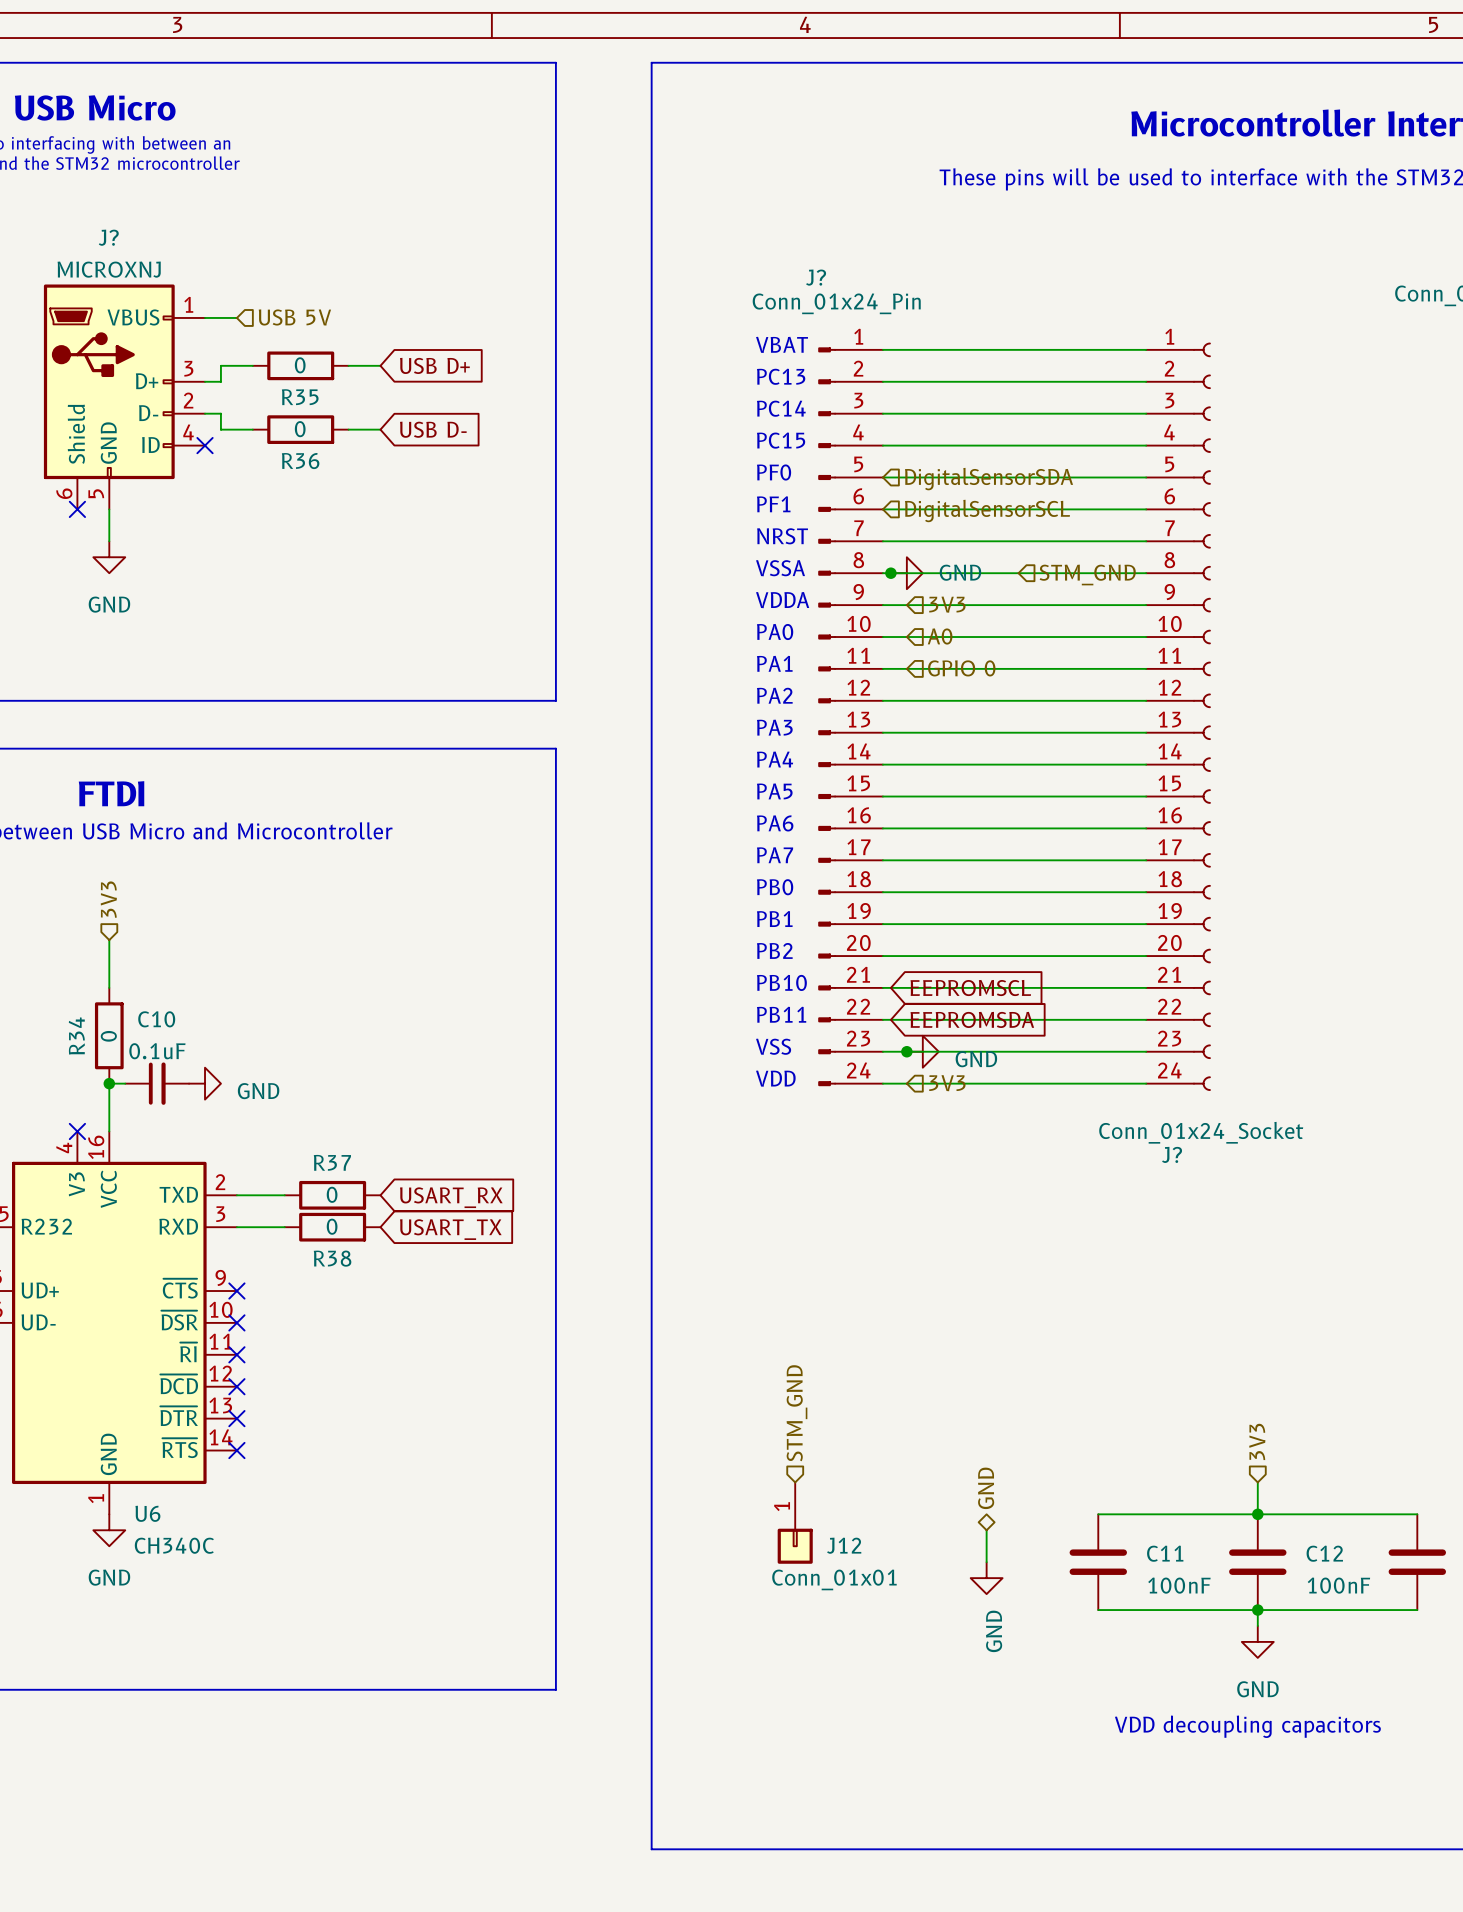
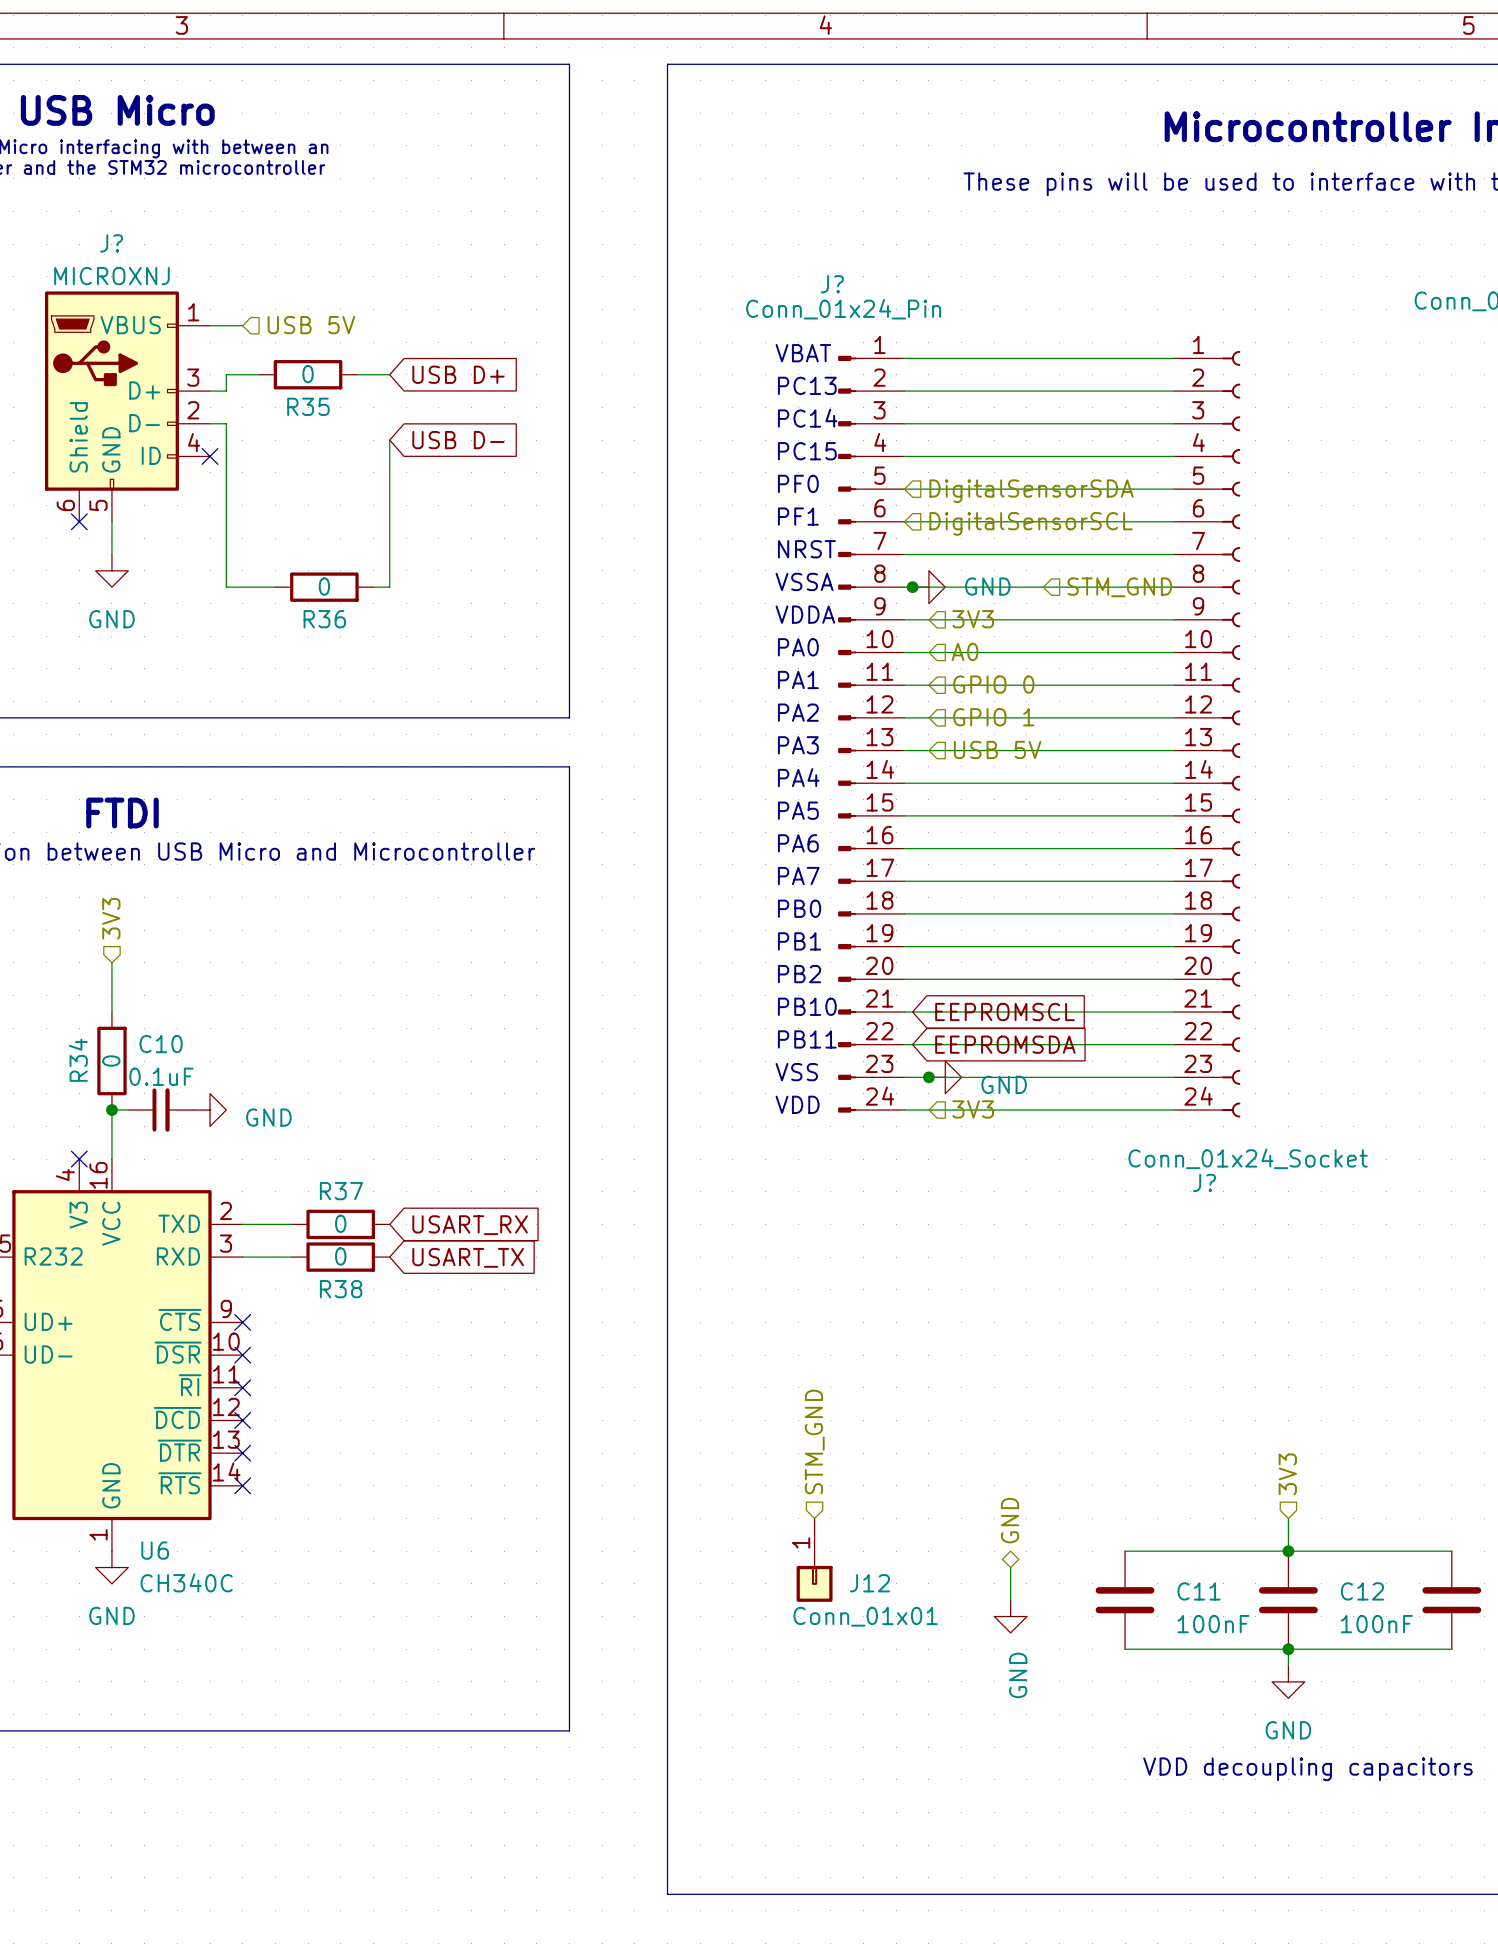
wire: (220, 429) (252, 429) -> (226, 440) (226, 587) (275, 587)
R36 position: (300, 429) -> (324, 587)
wire: (348, 429) (380, 429) -> (373, 587) (389, 587) (389, 440)
hierarchical label: none -> GPIO 1 (993, 717)
hierarchical label: none -> USB 5V (997, 749)

